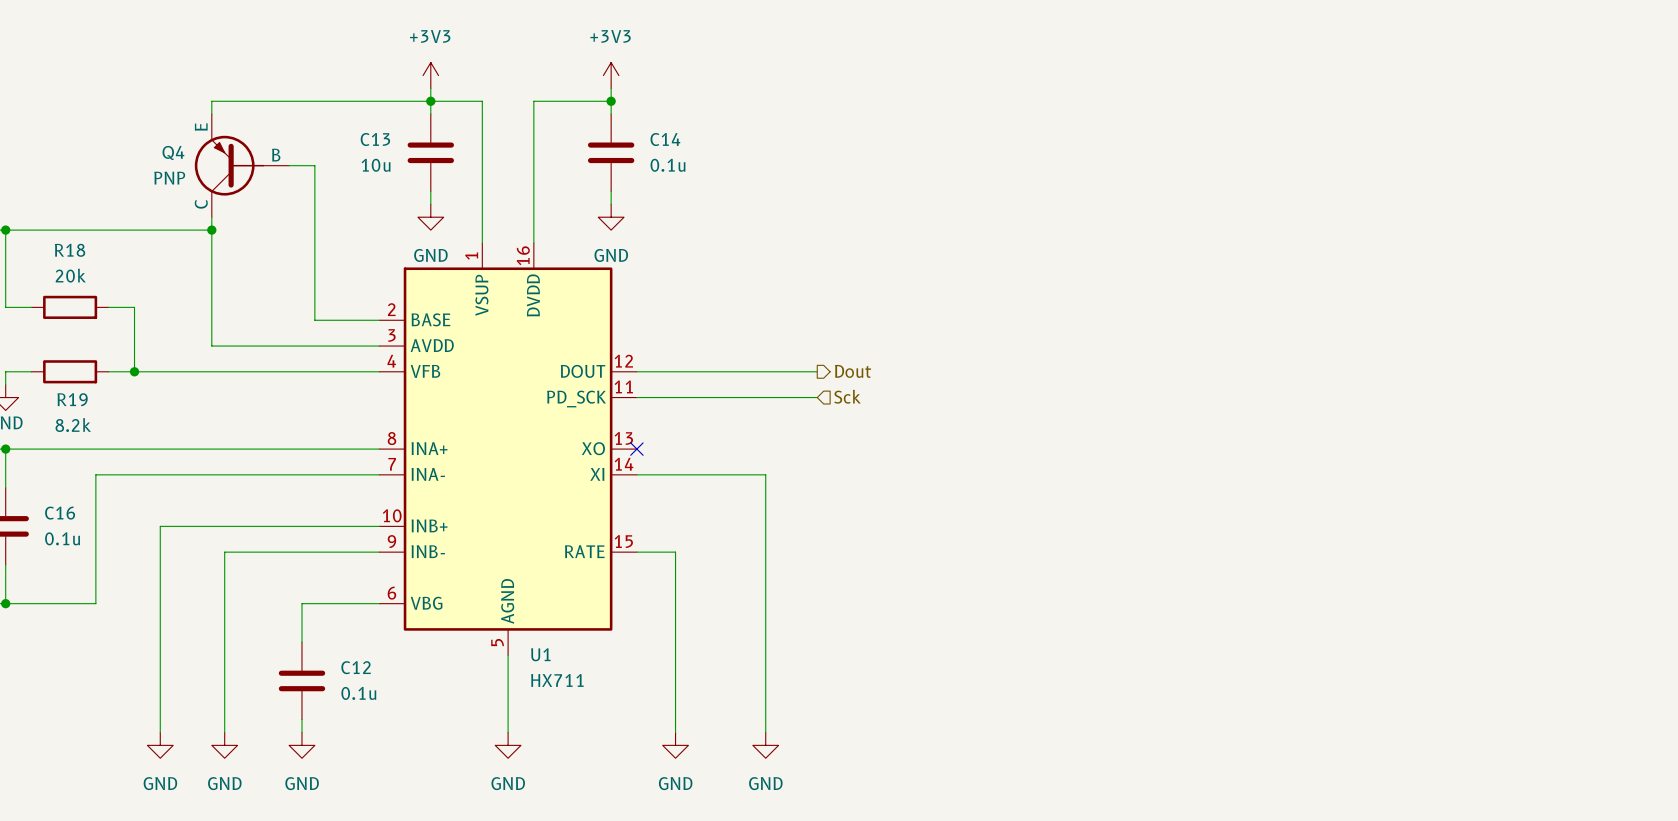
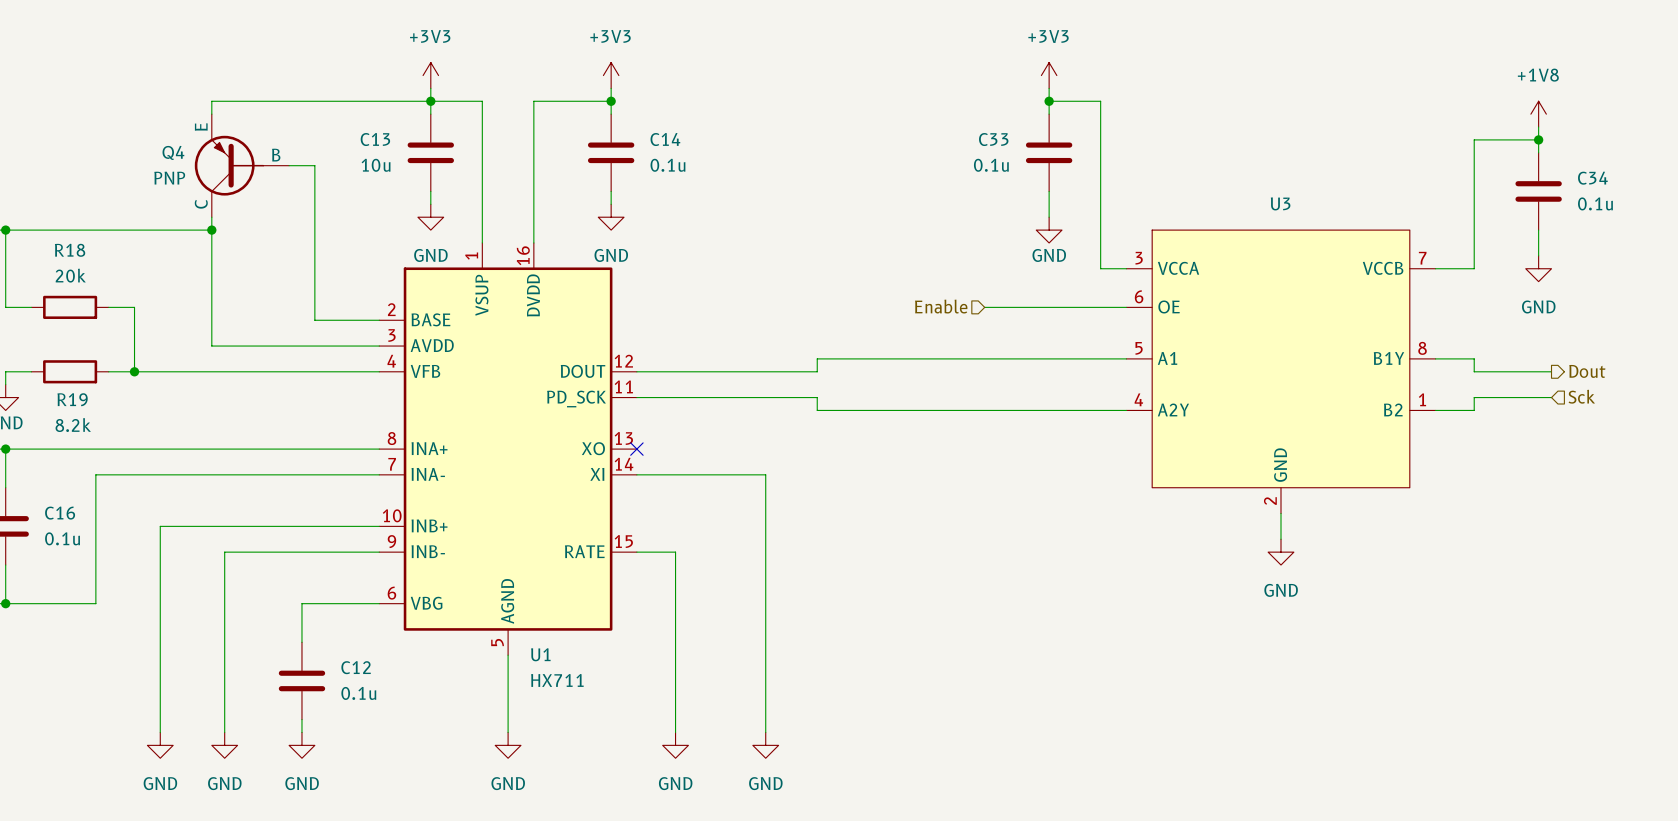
power symbol: none -> +3V3 (1049, 75)
wire: none -> (1049, 88) (1049, 114)
wire: none -> (1049, 101) (1100, 101) (1100, 268) (1126, 268)
junction: none -> (1049, 101)
power symbol: none -> +1V8 (1538, 114)
wire: none -> (1538, 127) (1538, 152)
wire: none -> (1538, 139) (1474, 139) (1474, 268) (1435, 268)
junction: none -> (1538, 139)
C33: none -> 0.1u (1049, 152)
wire: none -> (1049, 191) (1049, 217)
C34: none -> 0.1u (1538, 191)
power symbol: none -> GND (1049, 230)
wire: none -> (1538, 230) (1538, 255)
power symbol: none -> GND (1538, 268)
hierarchical label: none -> Enable (941, 306)
wire: none -> (984, 307) (1126, 307)
wire: none -> (1126, 358) (817, 358) (817, 371)
wire: none -> (1435, 358) (1474, 358) (1474, 371) (1551, 371)
hierarchical label: Dout (853, 371) -> none
U3: none -> (1280, 371)
hierarchical label: none -> Dout (1587, 371)
hierarchical label: Sck (847, 396) -> none
hierarchical label: none -> Sck (1581, 396)
wire: none -> (817, 397) (817, 410) (1126, 410)
wire: none -> (1551, 397) (1474, 397) (1474, 410) (1435, 410)
wire: none -> (1280, 513) (1280, 539)
power symbol: none -> GND (1280, 552)

